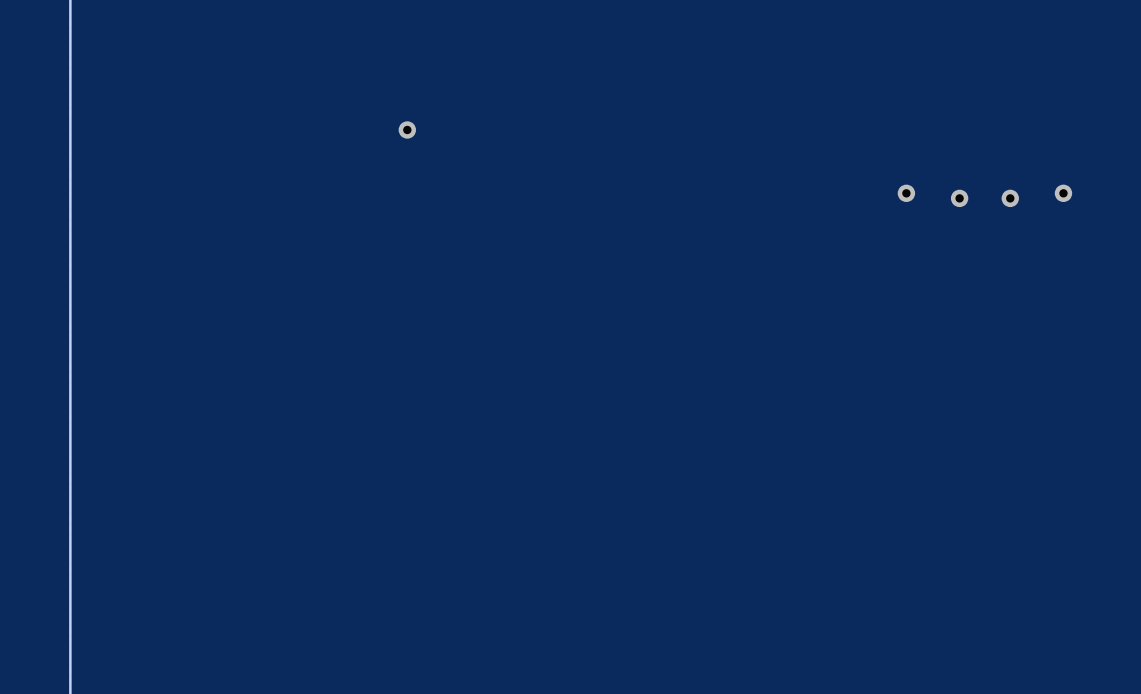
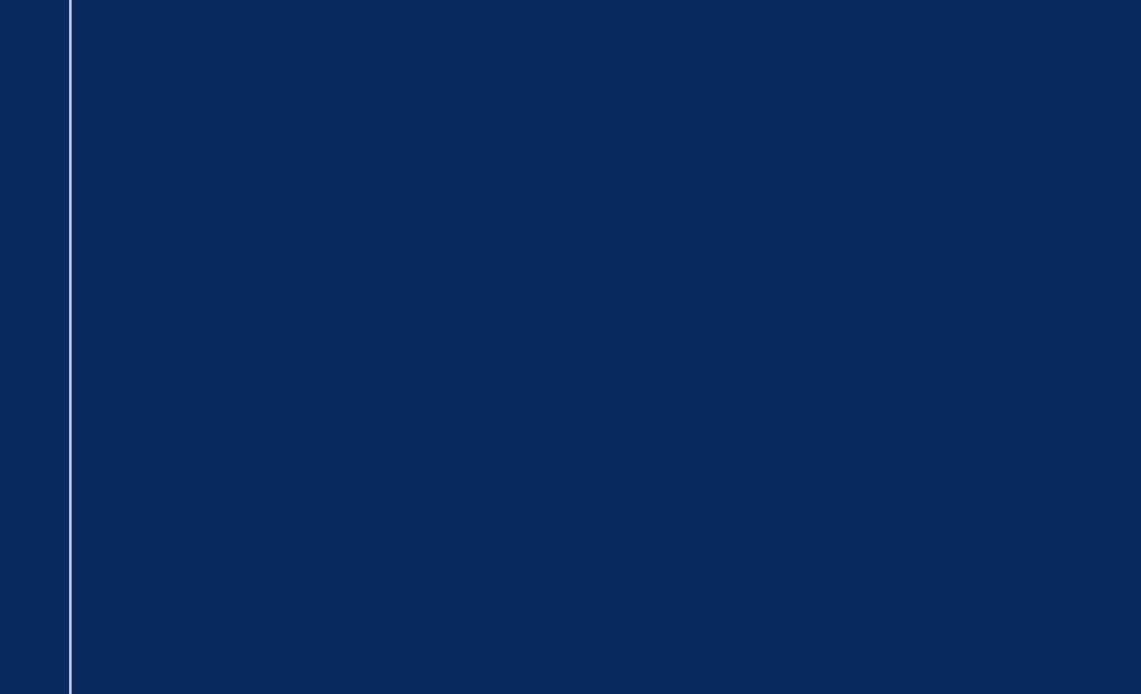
via: (407, 129) -> none
via: (906, 193) -> none
via: (1063, 193) -> none
via: (959, 198) -> none
via: (1010, 198) -> none

